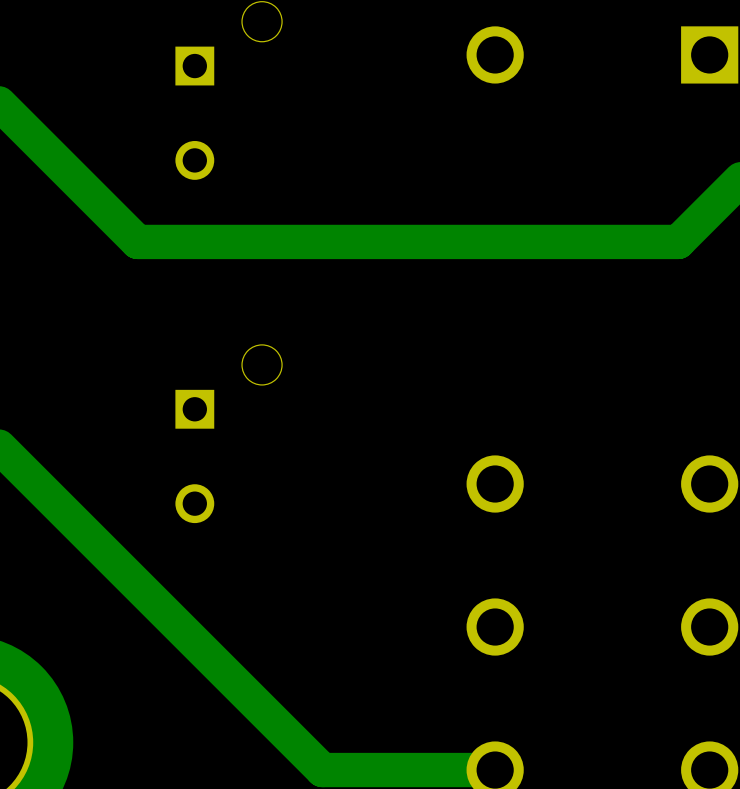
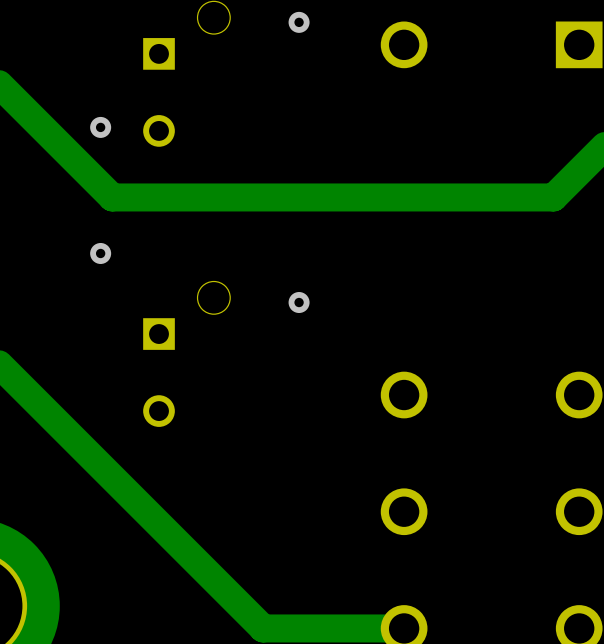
via: none -> (299, 22)
via: none -> (100, 127)
via: none -> (100, 253)
via: none -> (299, 302)

